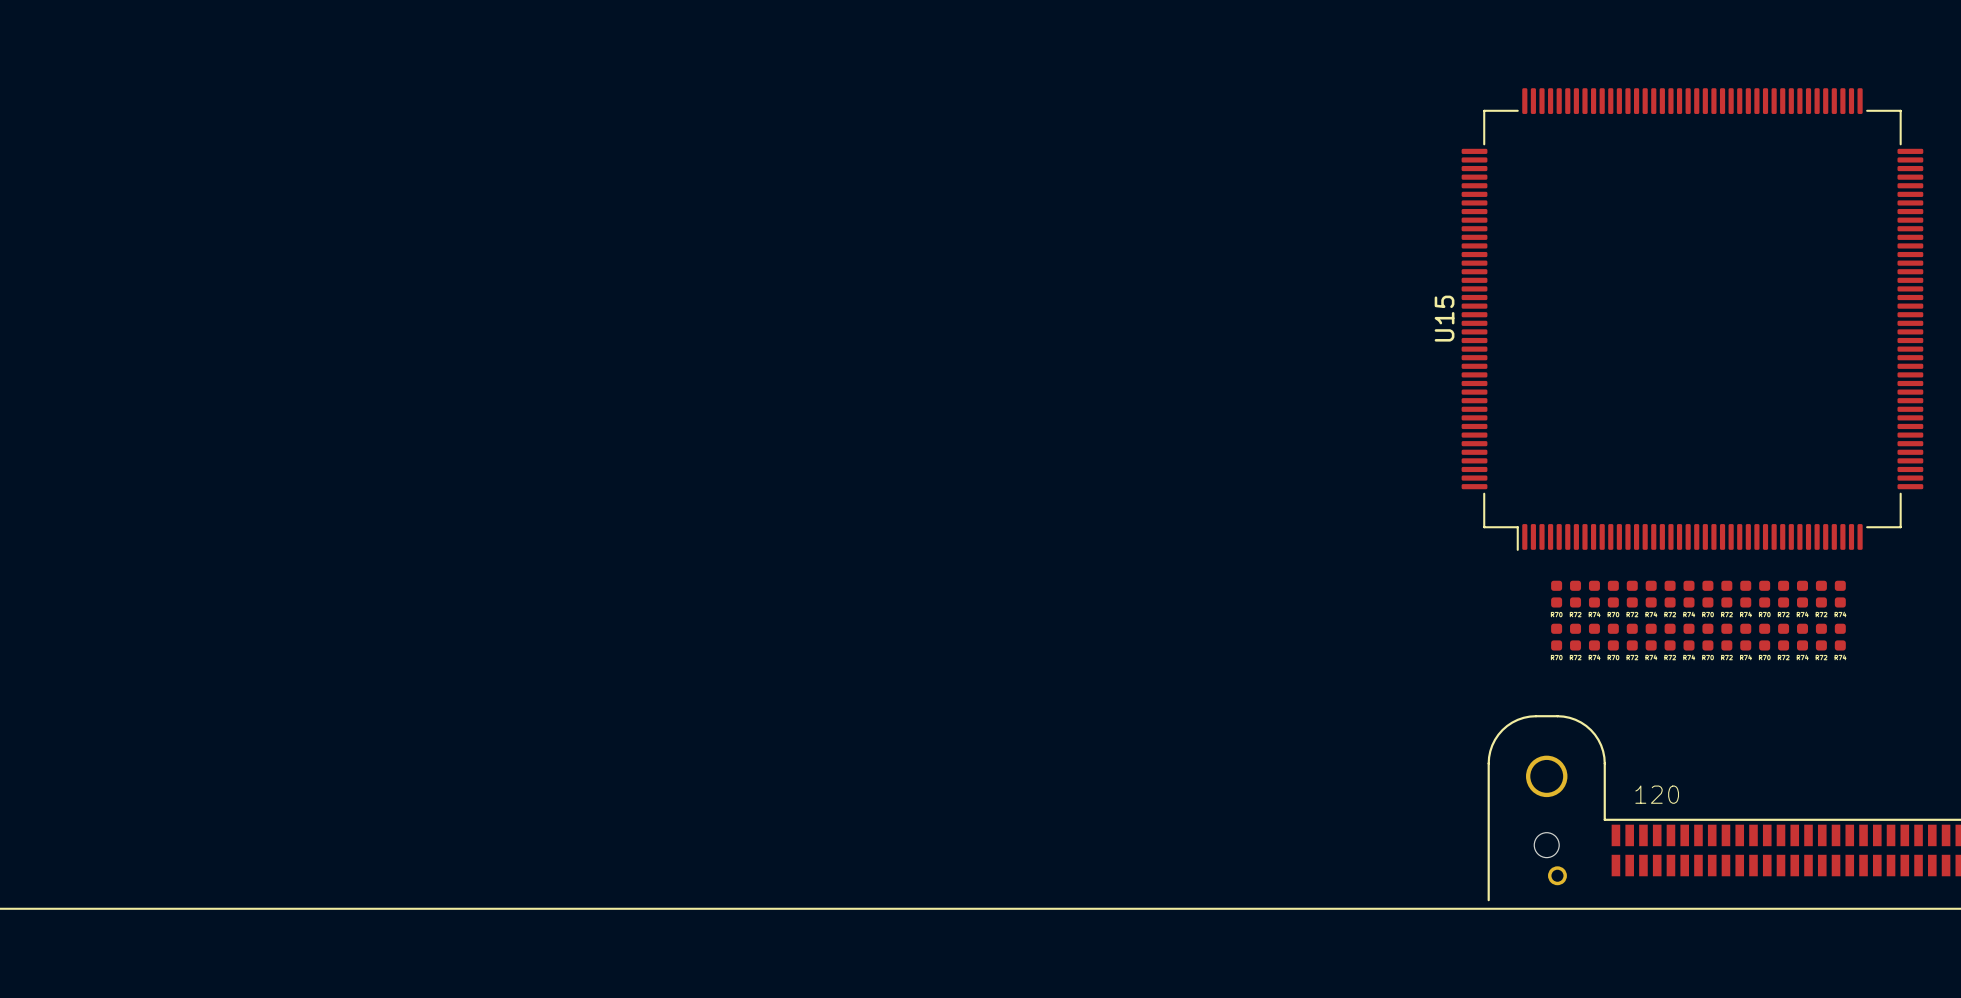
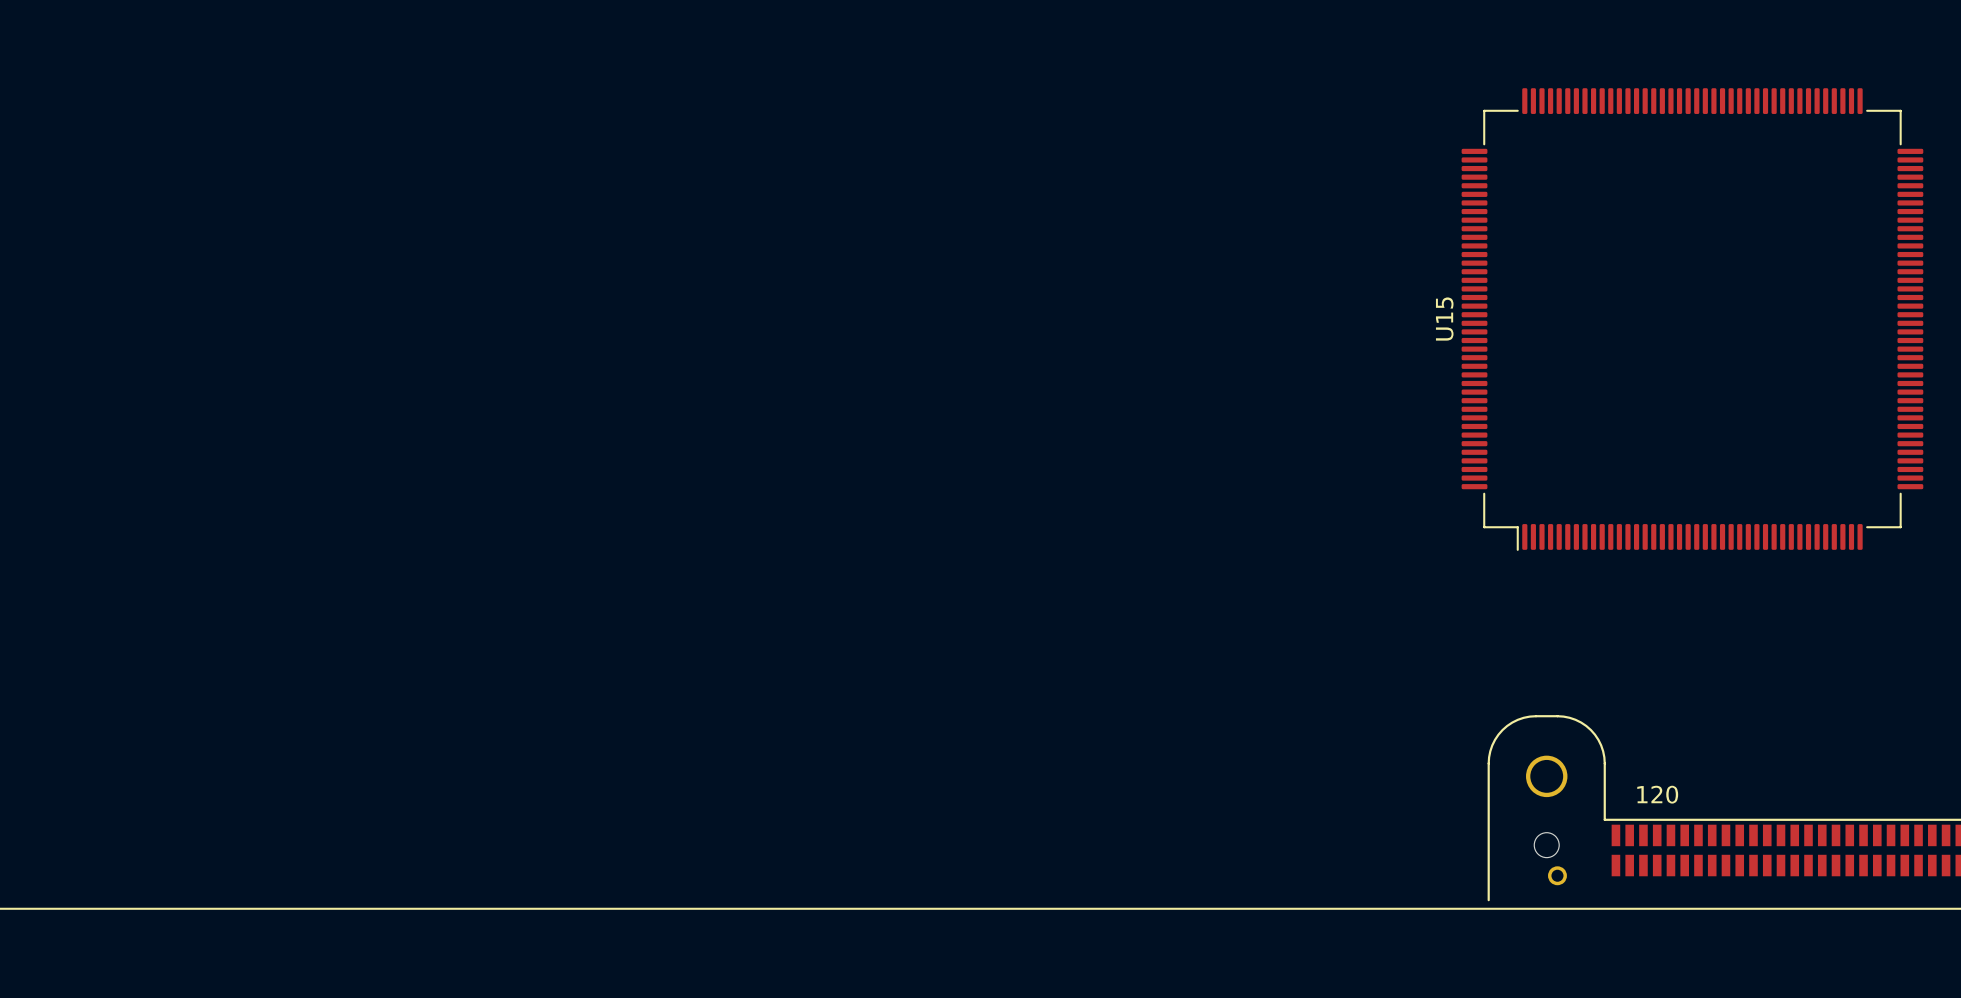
part: (1556, 594) -> none
part: (1575, 594) -> none
part: (1594, 594) -> none
part: (1613, 594) -> none
part: (1632, 594) -> none
part: (1651, 594) -> none
part: (1670, 594) -> none
part: (1689, 594) -> none
part: (1707, 594) -> none
part: (1726, 594) -> none
part: (1745, 594) -> none
part: (1764, 594) -> none
part: (1783, 594) -> none
part: (1802, 594) -> none
part: (1821, 594) -> none
part: (1840, 594) -> none
part: (1556, 637) -> none
part: (1575, 637) -> none
part: (1594, 637) -> none
part: (1613, 637) -> none
part: (1632, 637) -> none
part: (1651, 637) -> none
part: (1670, 637) -> none
part: (1689, 637) -> none
part: (1707, 637) -> none
part: (1726, 637) -> none
part: (1745, 637) -> none
part: (1764, 637) -> none
part: (1783, 637) -> none
part: (1802, 637) -> none
part: (1821, 637) -> none
part: (1840, 637) -> none

